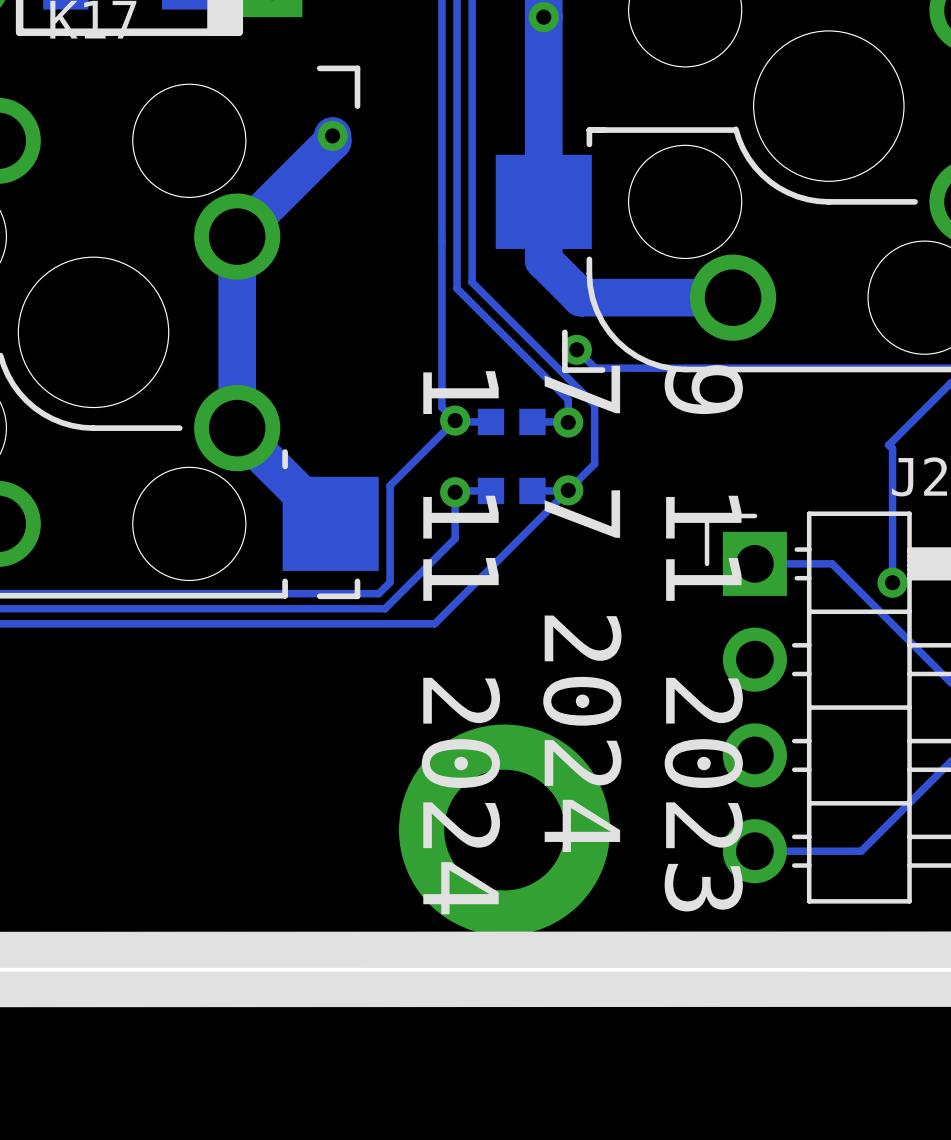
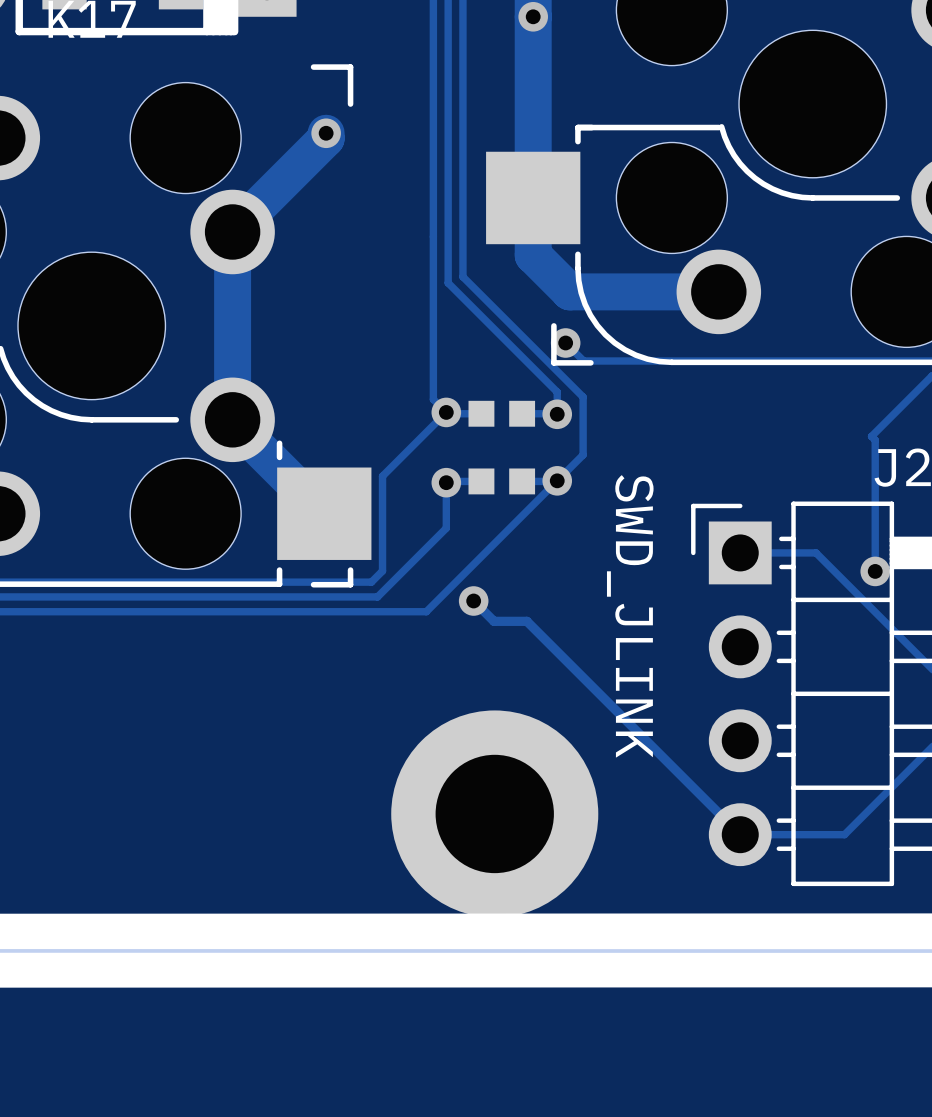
text: 7 7 2024 (582, 608) -> none
track: none -> (473, 601) (494, 621) (526, 621) (740, 834)
via: none -> (473, 601)
J2 value: none -> SWD_JLINK (630, 616)
text: 9 11 2023 (703, 638) -> none
text: 1 11 2024 (460, 642) -> none

